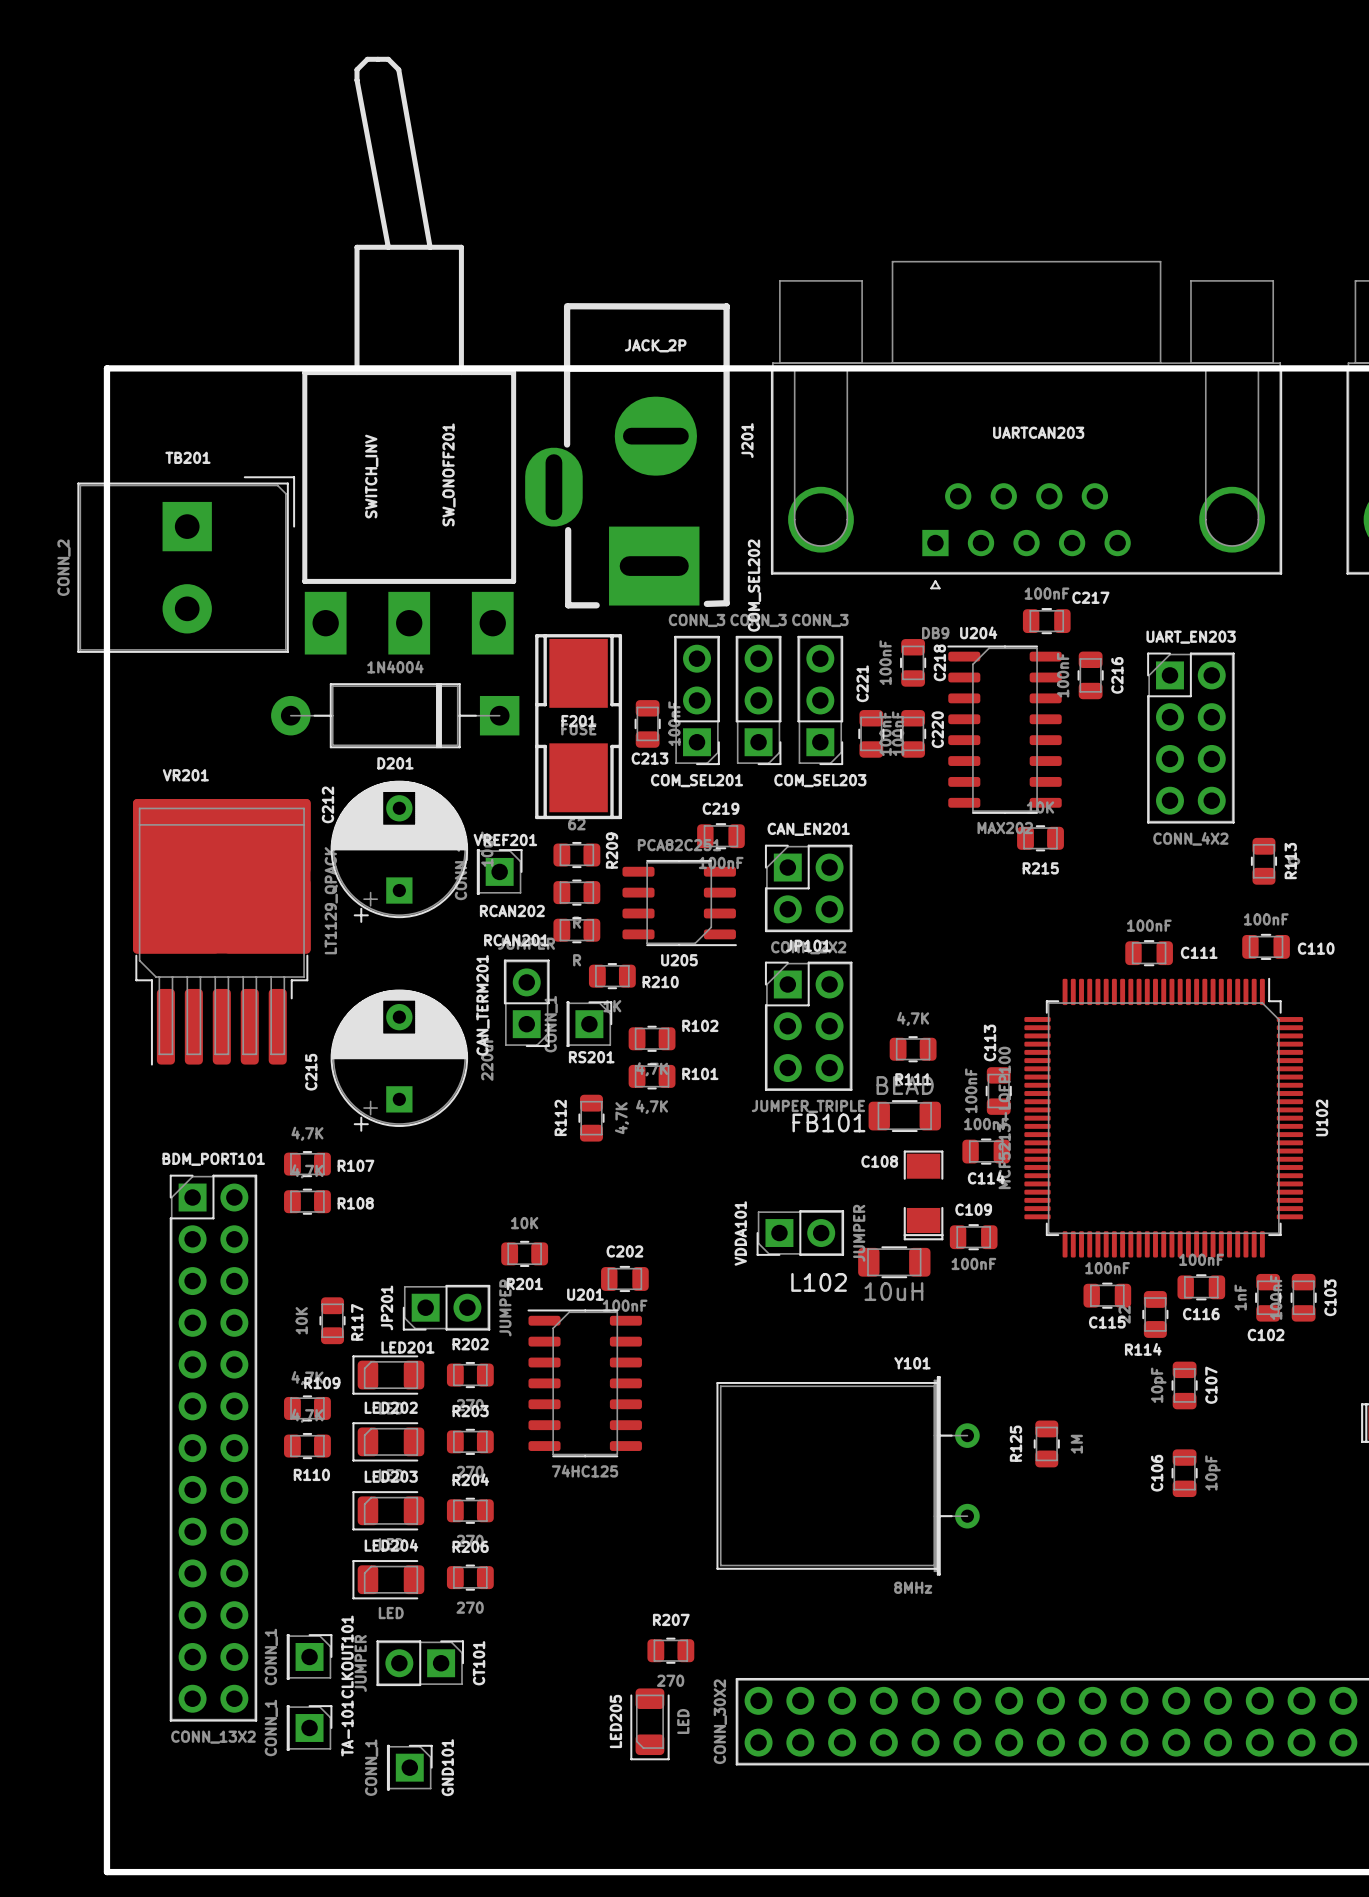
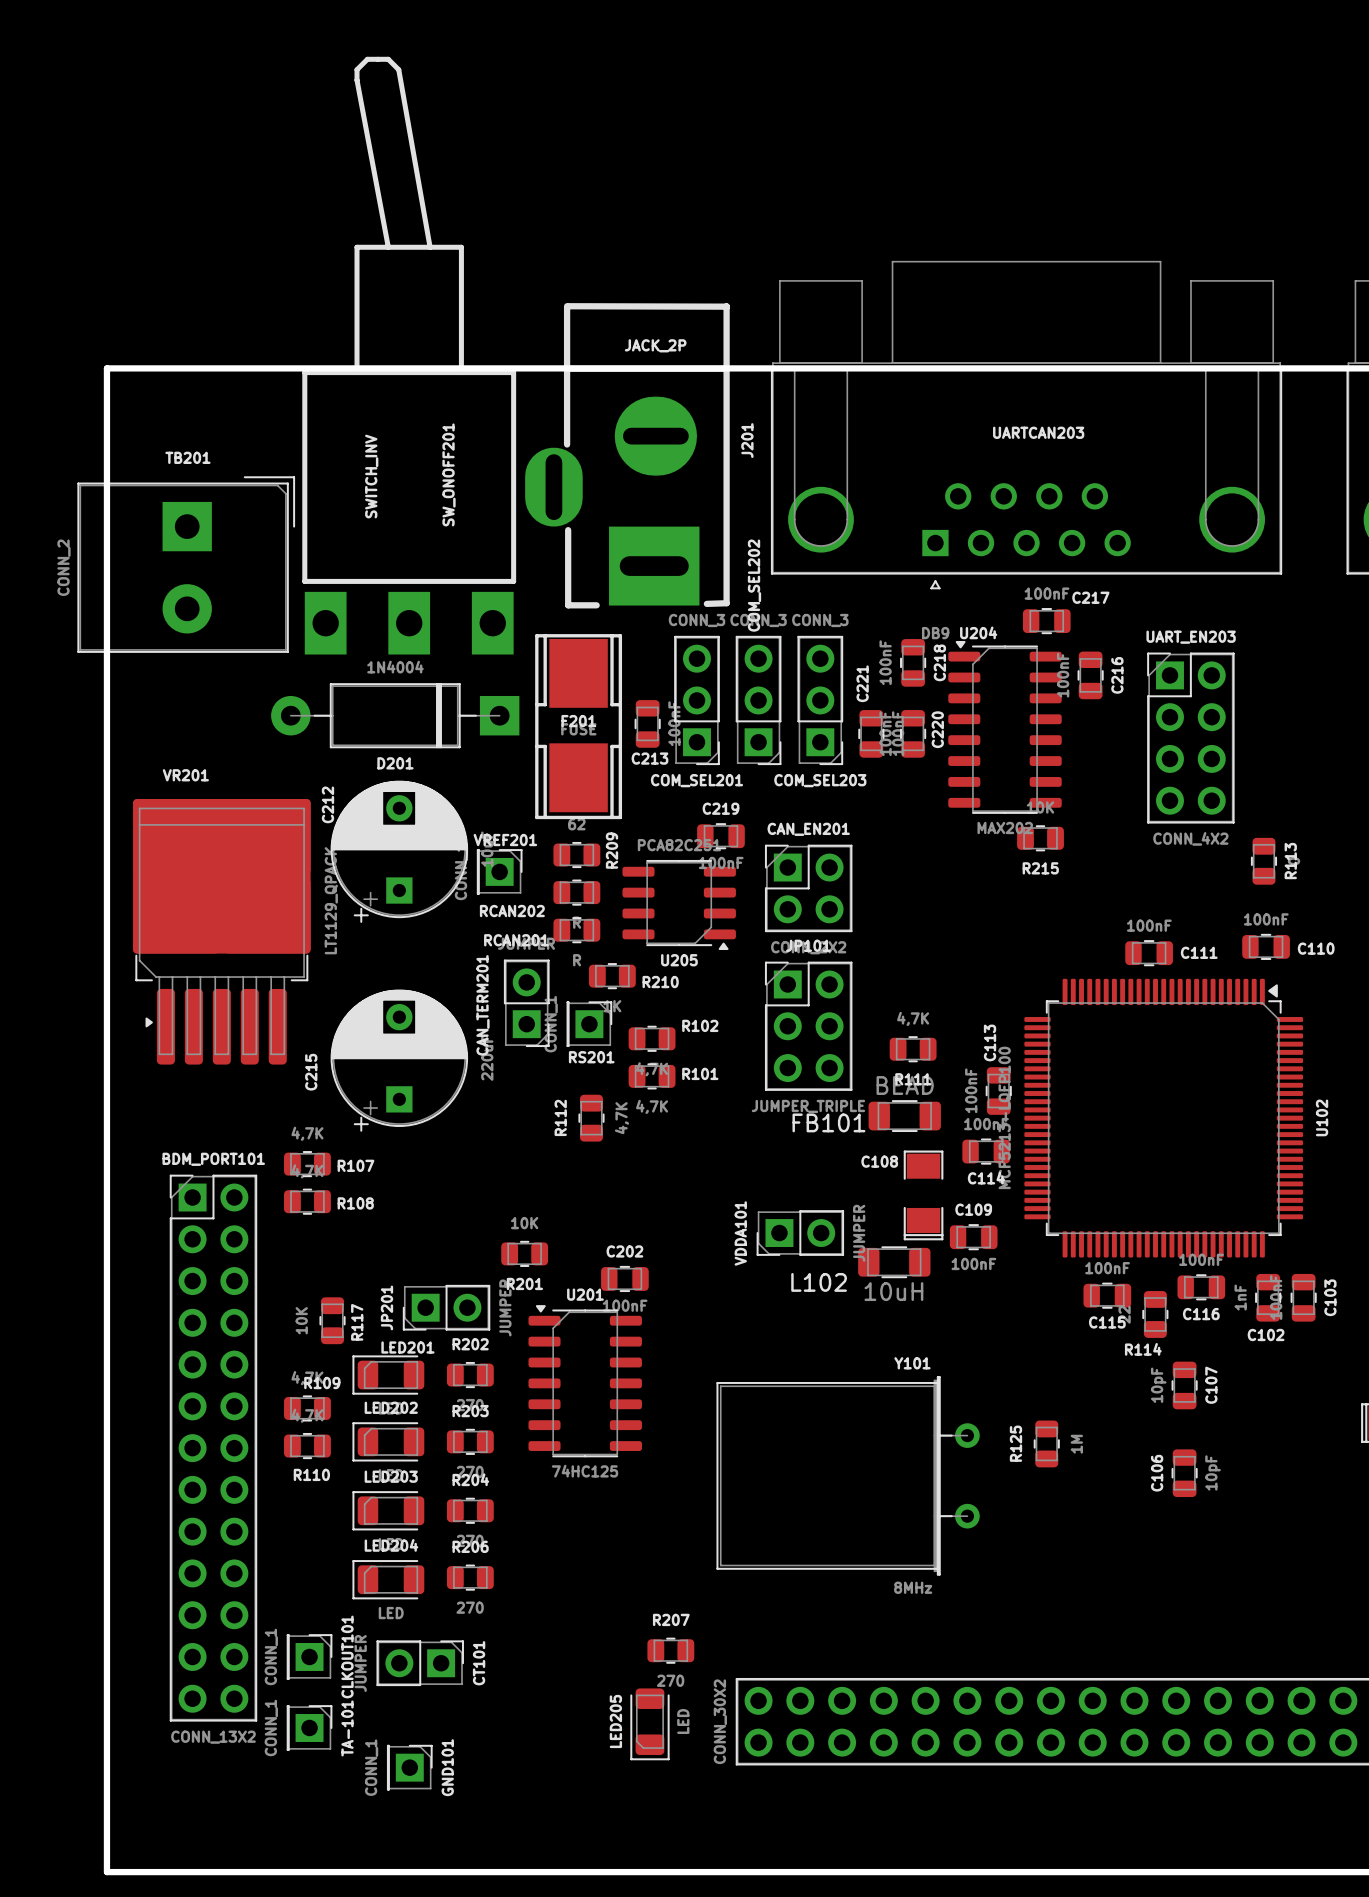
U204 footprint: [947, 645, 1062, 814] -> [948, 640, 1062, 814]
VR201 footprint: [133, 799, 311, 1066] -> [133, 799, 311, 1065]
U205 footprint: [622, 859, 737, 947] -> [622, 859, 736, 950]
U102 footprint: [1024, 977, 1304, 1258] -> [1024, 978, 1304, 1258]
U201 footprint: [527, 1309, 642, 1458] -> [528, 1305, 642, 1458]

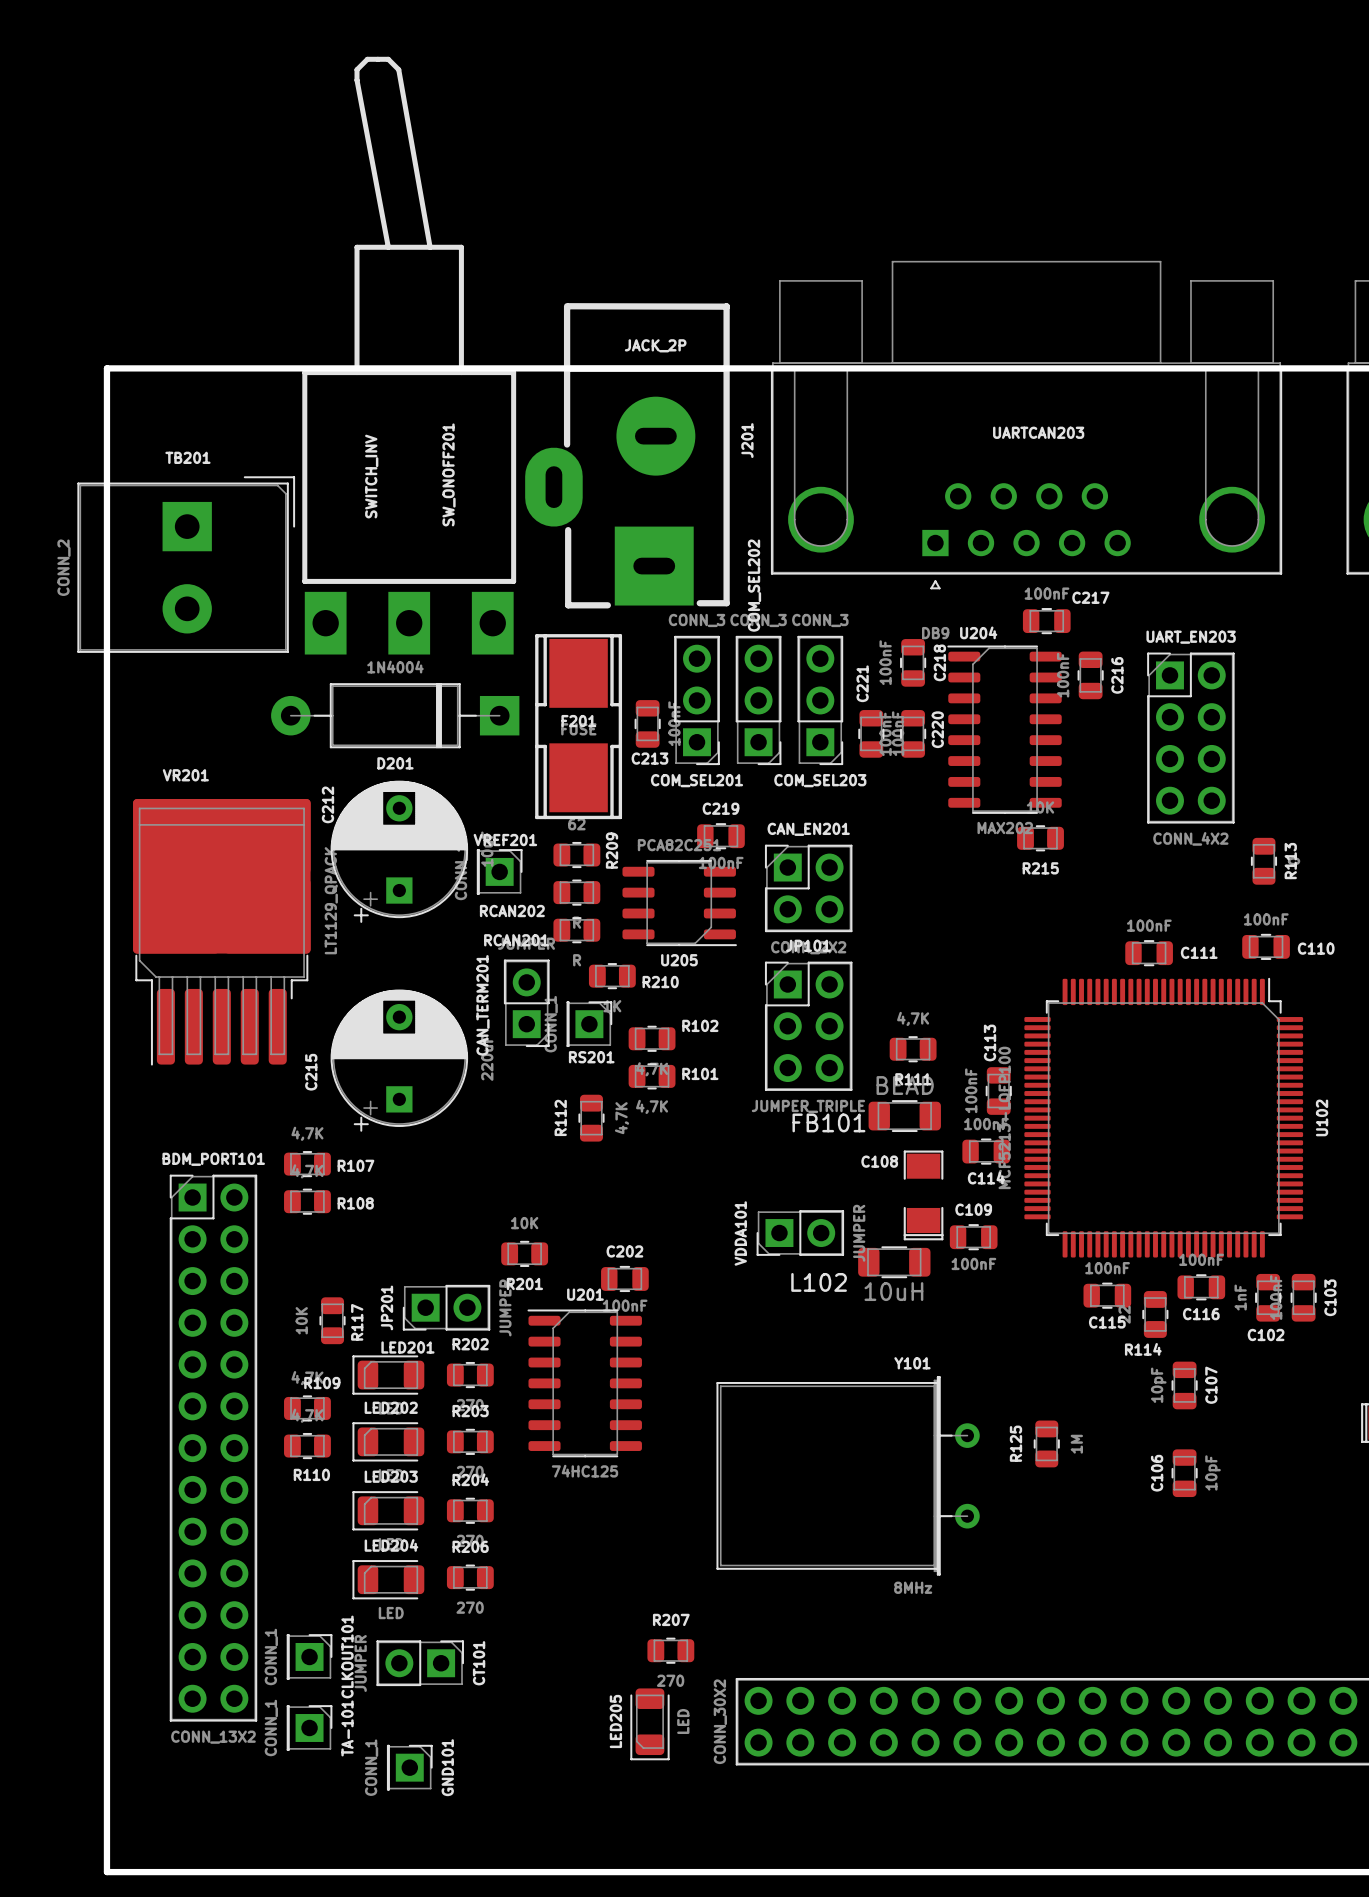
J201 footprint: [525, 303, 731, 609] -> [525, 303, 731, 609]
U204 footprint: [948, 640, 1062, 814] -> [947, 645, 1062, 814]
VR201 footprint: [133, 799, 311, 1065] -> [133, 799, 311, 1066]
U205 footprint: [622, 859, 736, 950] -> [622, 859, 737, 947]
U102 footprint: [1024, 978, 1304, 1258] -> [1024, 977, 1304, 1258]
U201 footprint: [528, 1305, 642, 1458] -> [527, 1309, 642, 1458]

